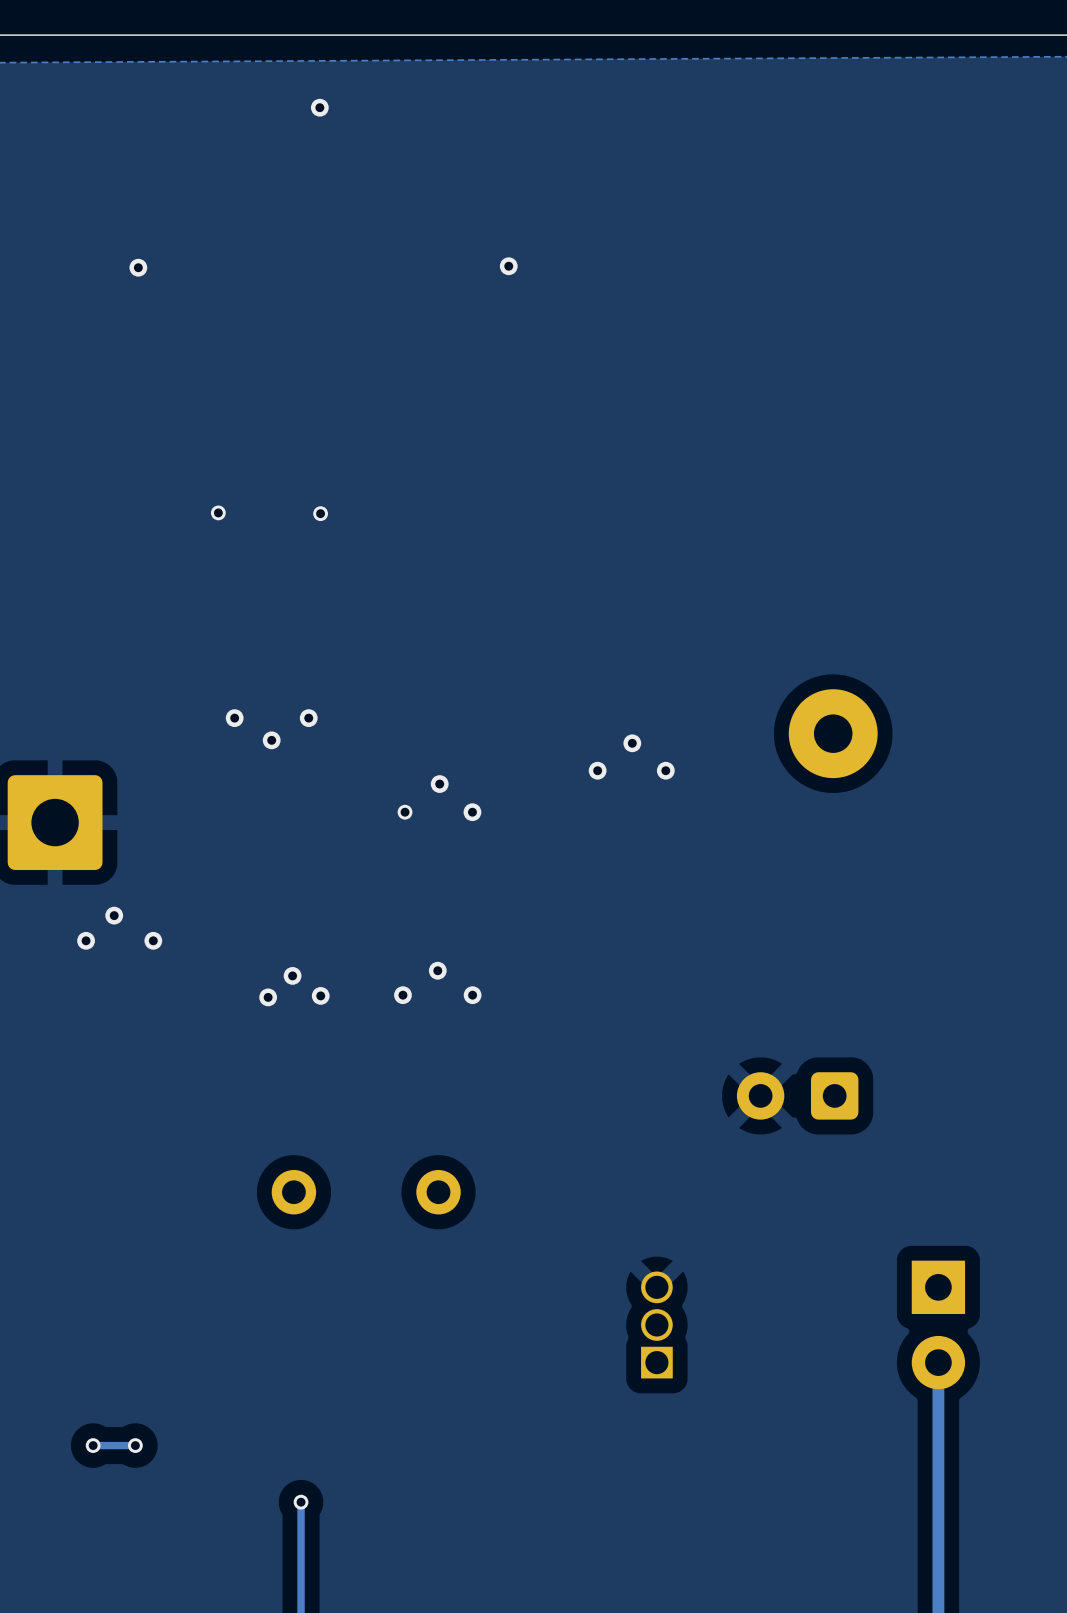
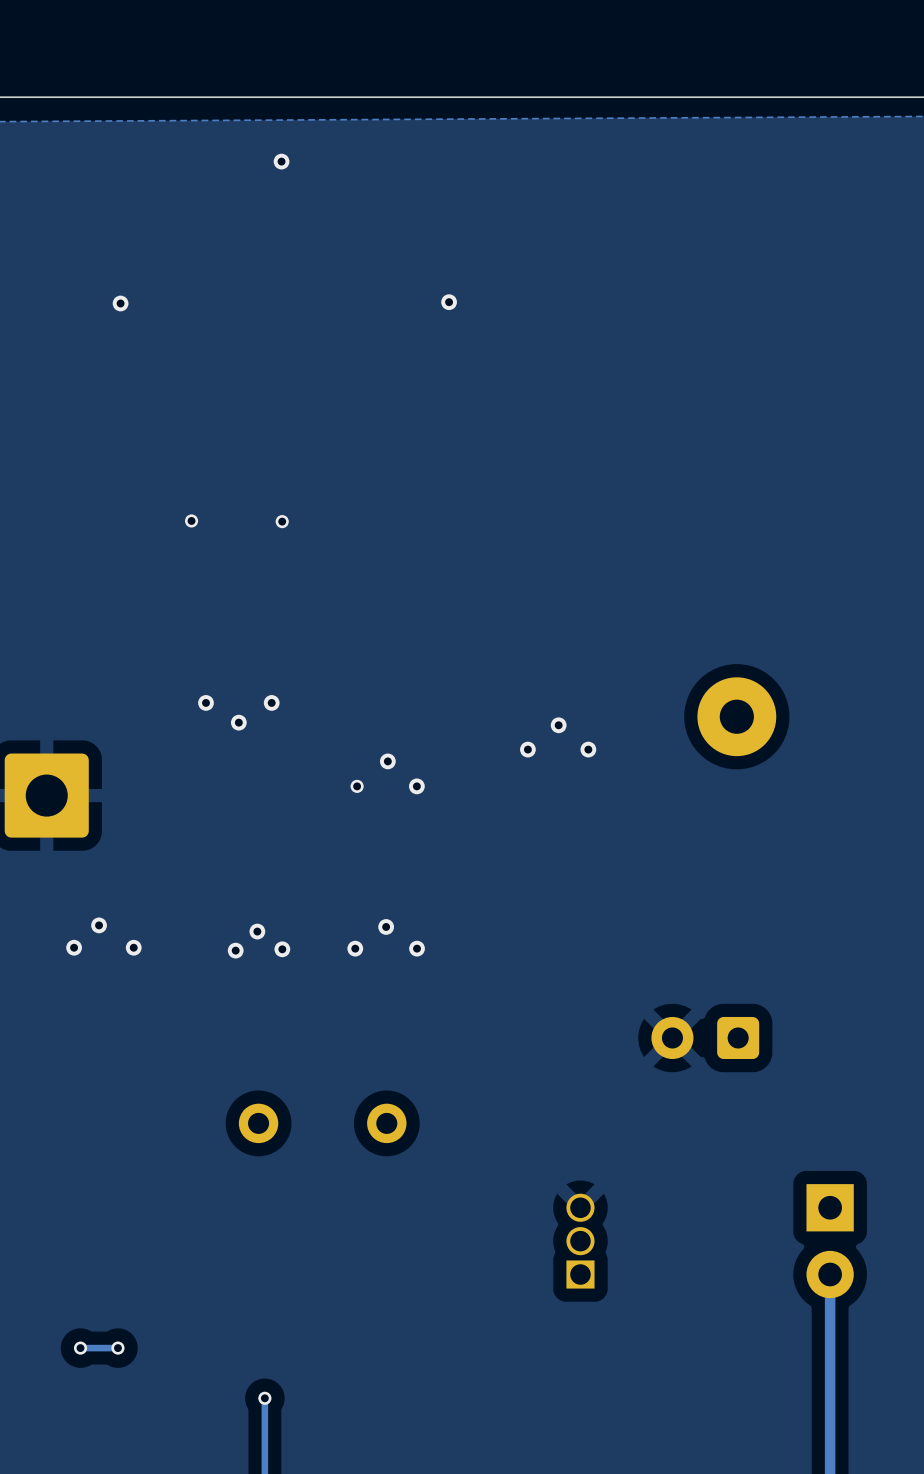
via: (114, 915) -> none
via: (86, 940) -> none
via: (153, 940) -> none
via: none -> (99, 925)
via: none -> (74, 947)
via: none -> (133, 947)

